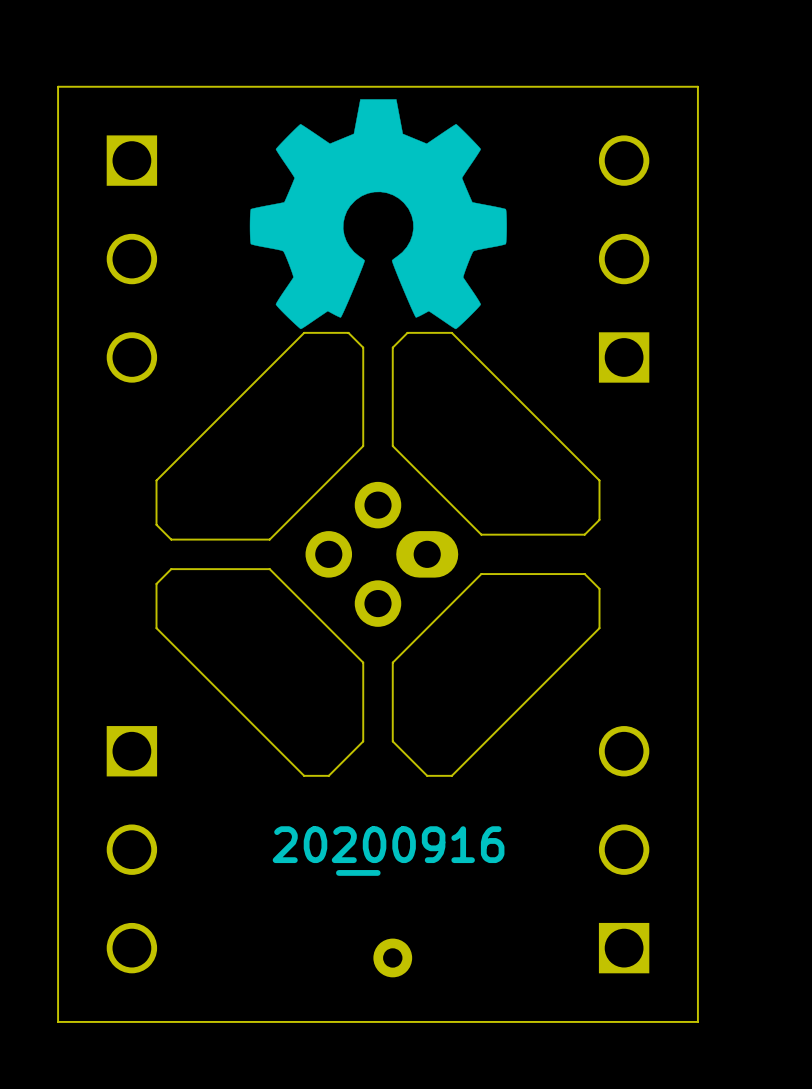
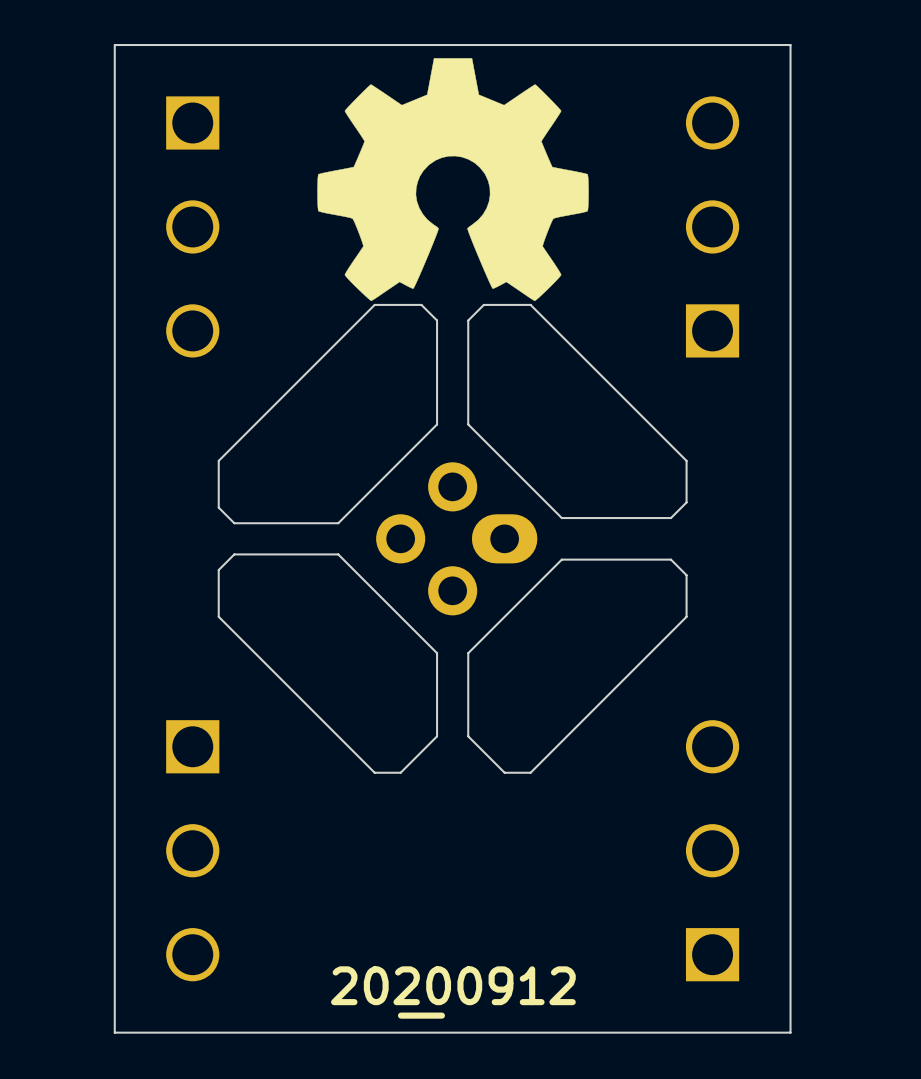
drawing: [336, 870, 381, 876] -> none
part: (392, 957) -> none
drawing: none -> [397, 1012, 446, 1019]

